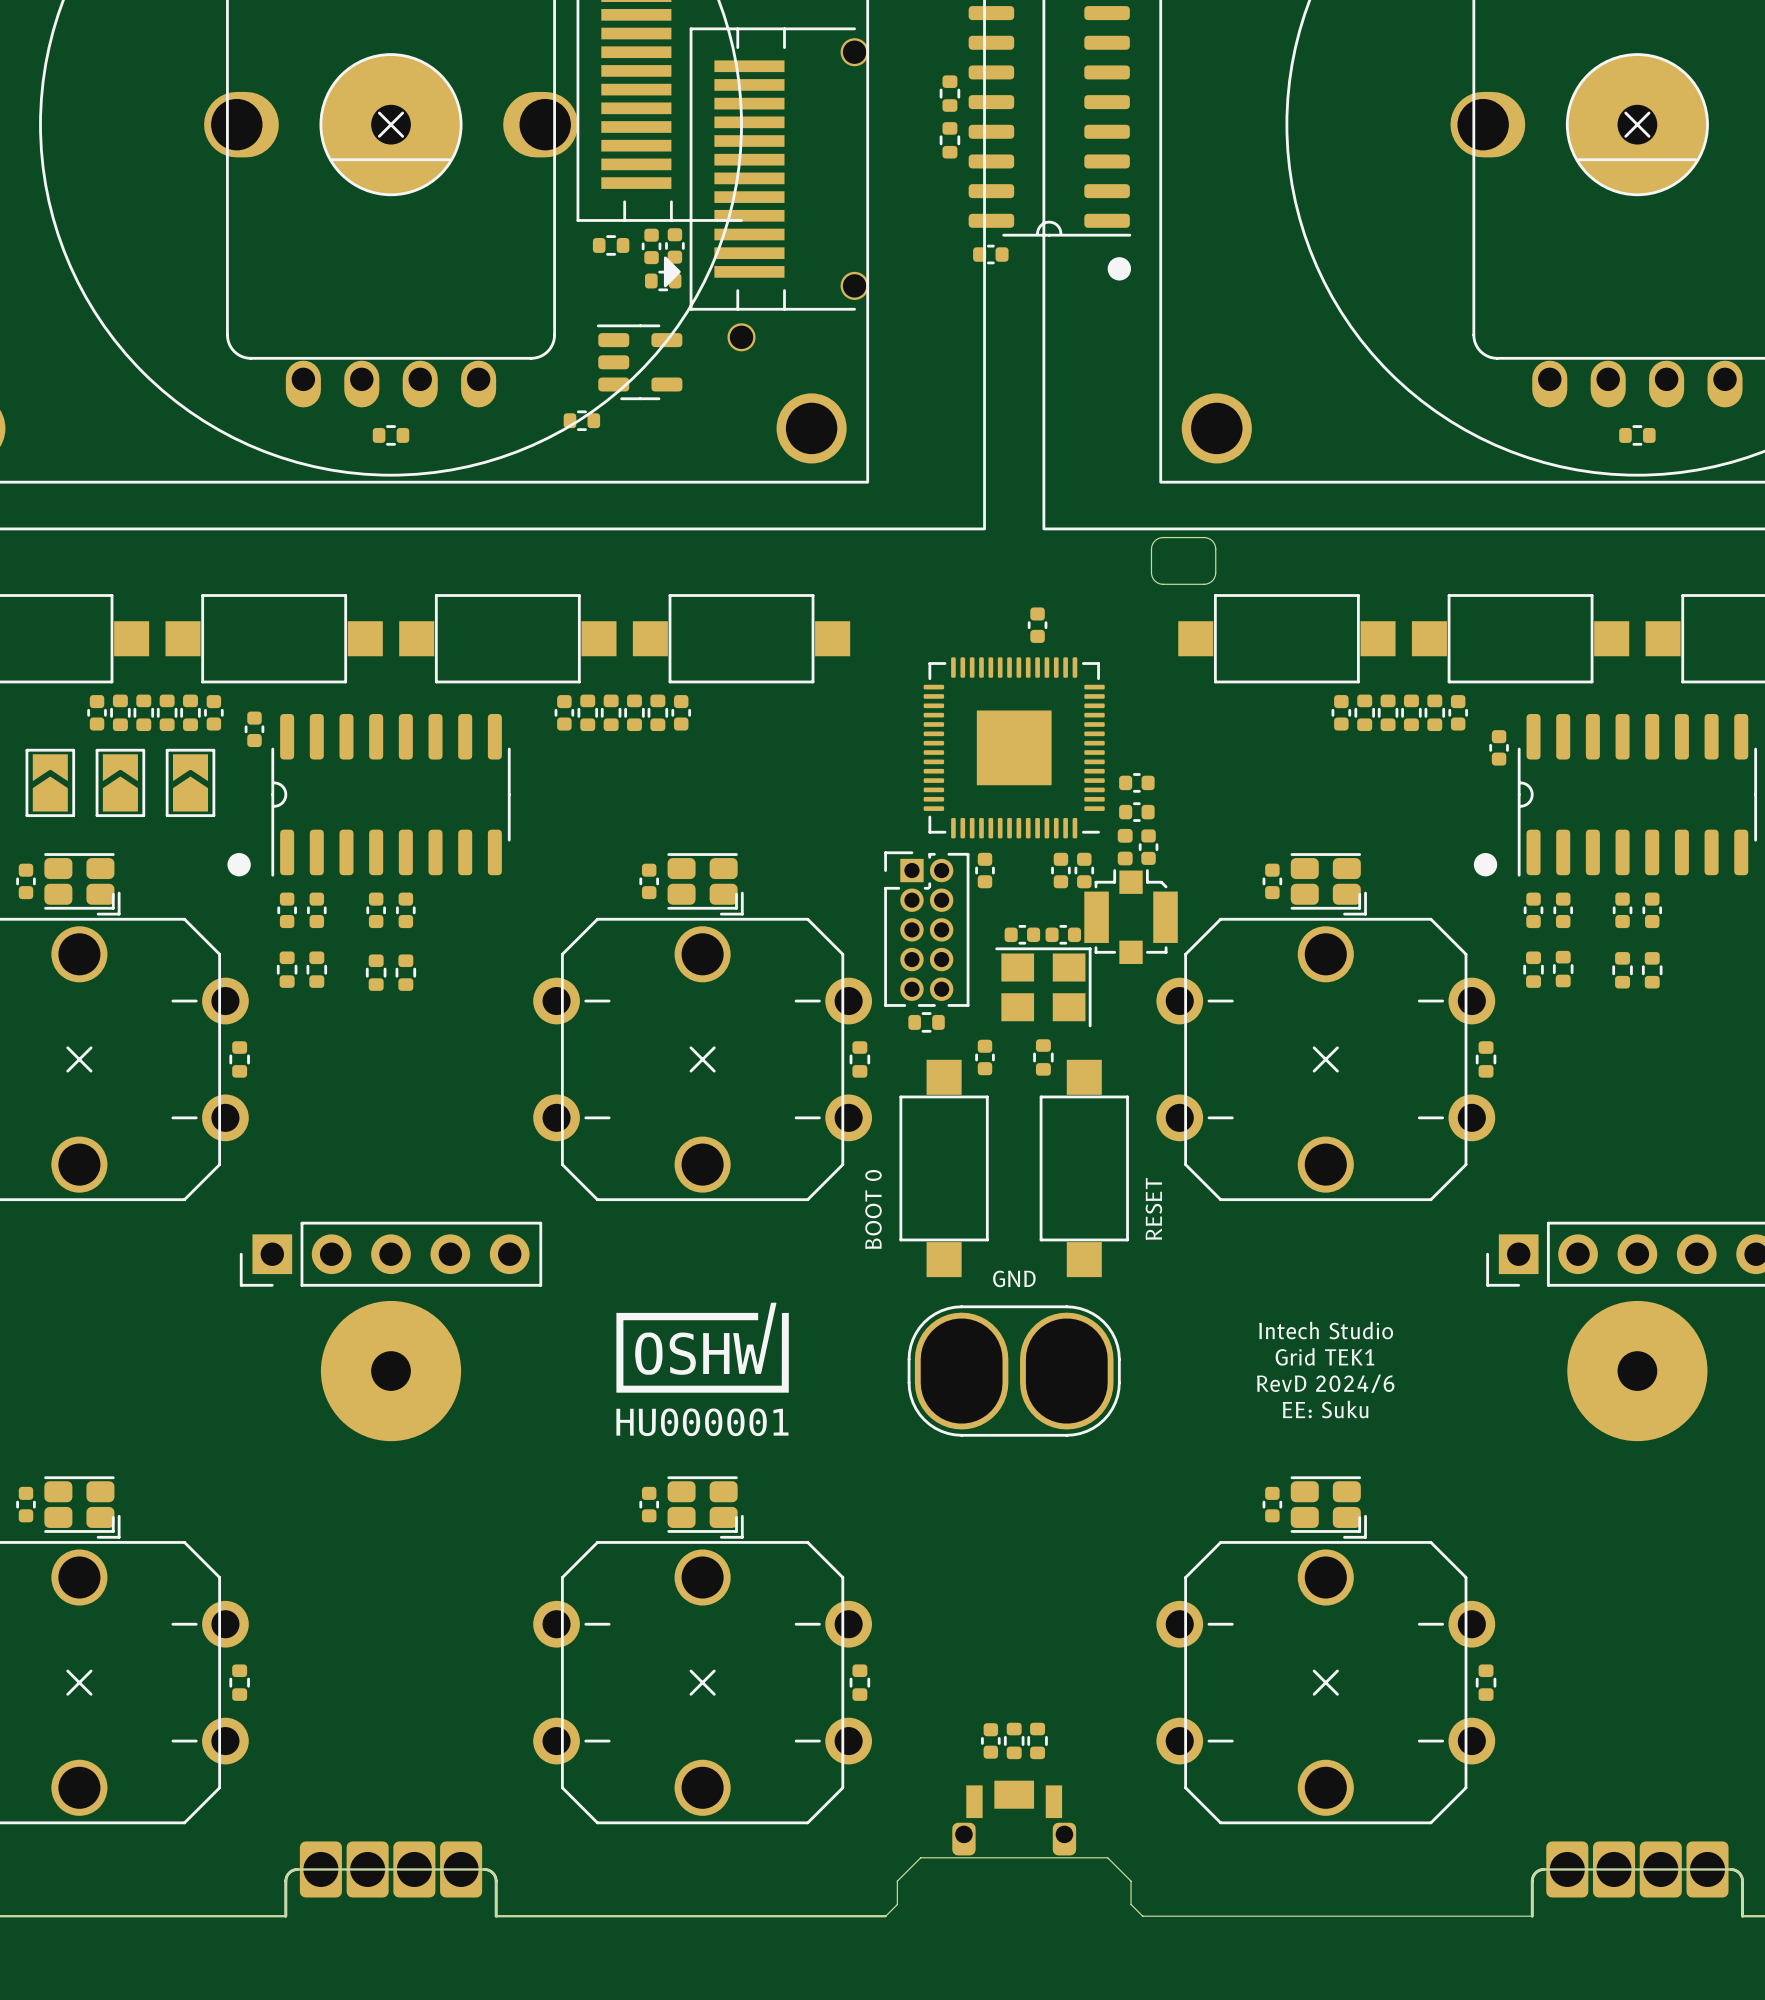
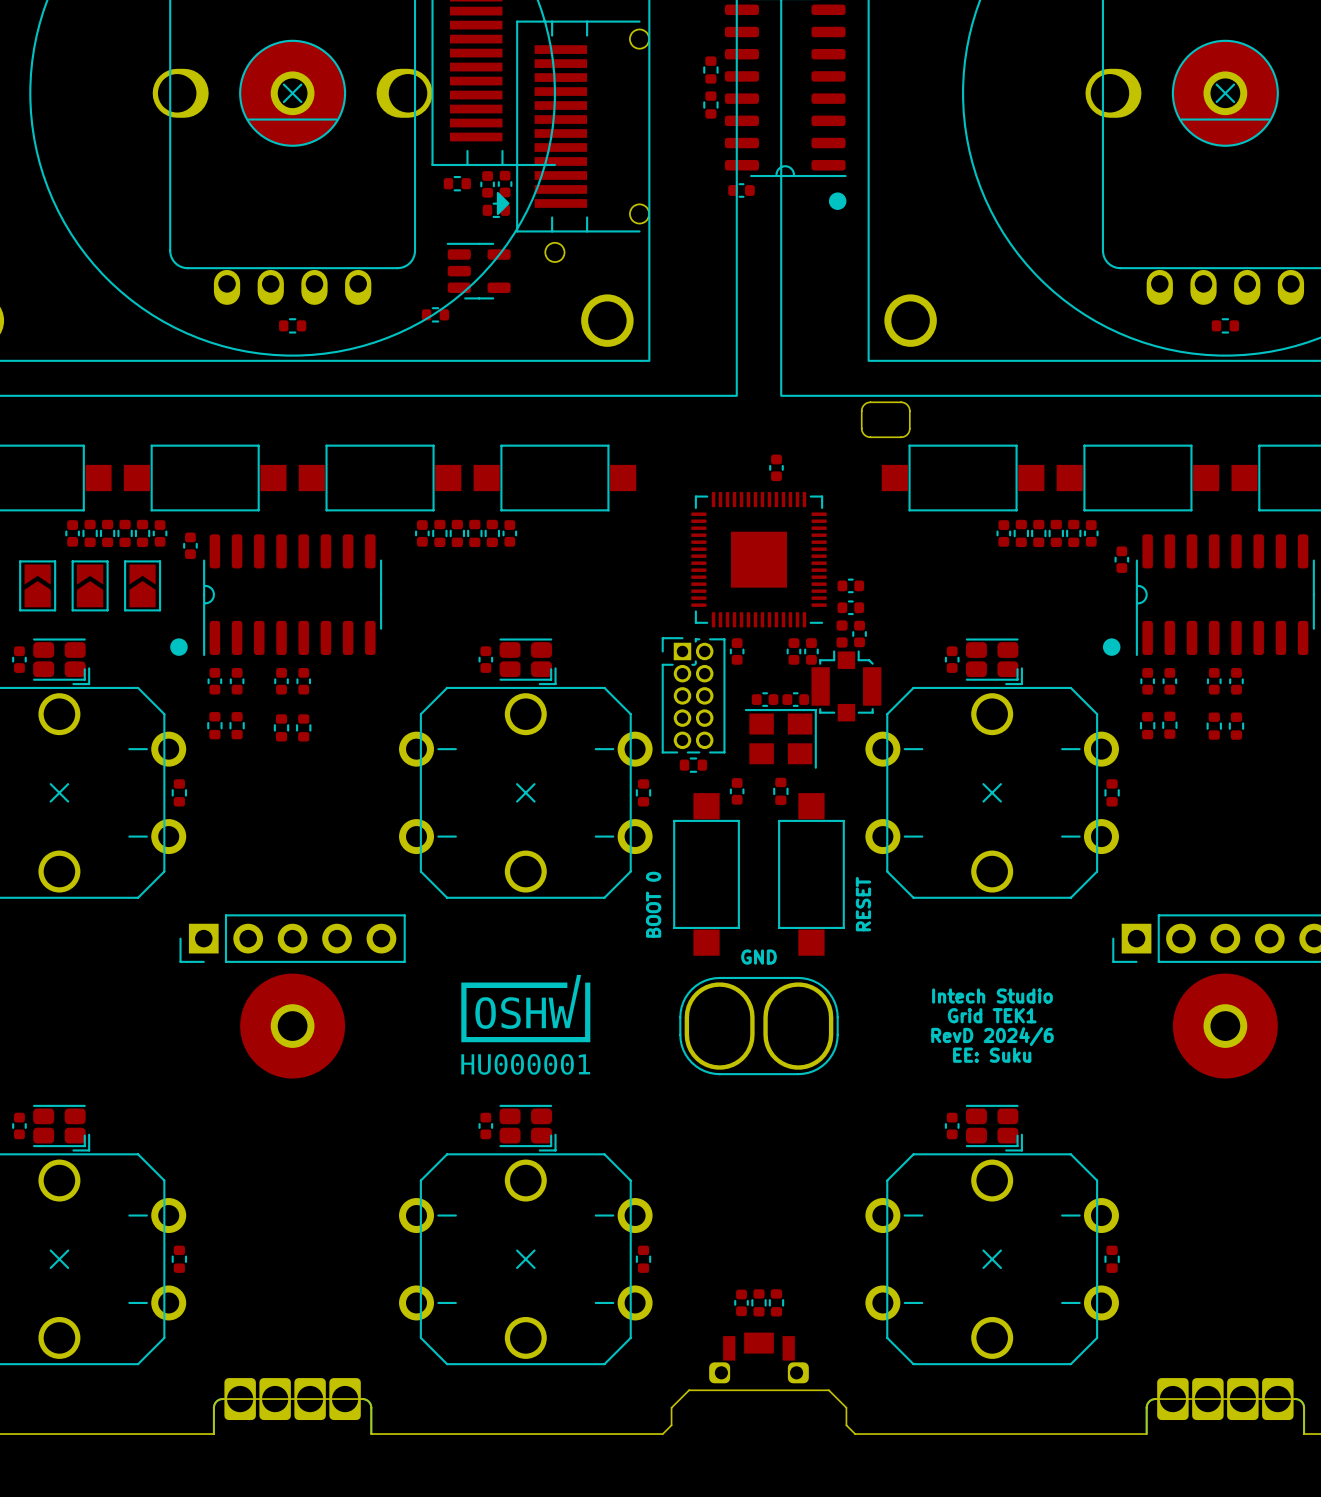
part footprint: [952, 1780, 1077, 1856] -> [709, 1332, 809, 1384]

